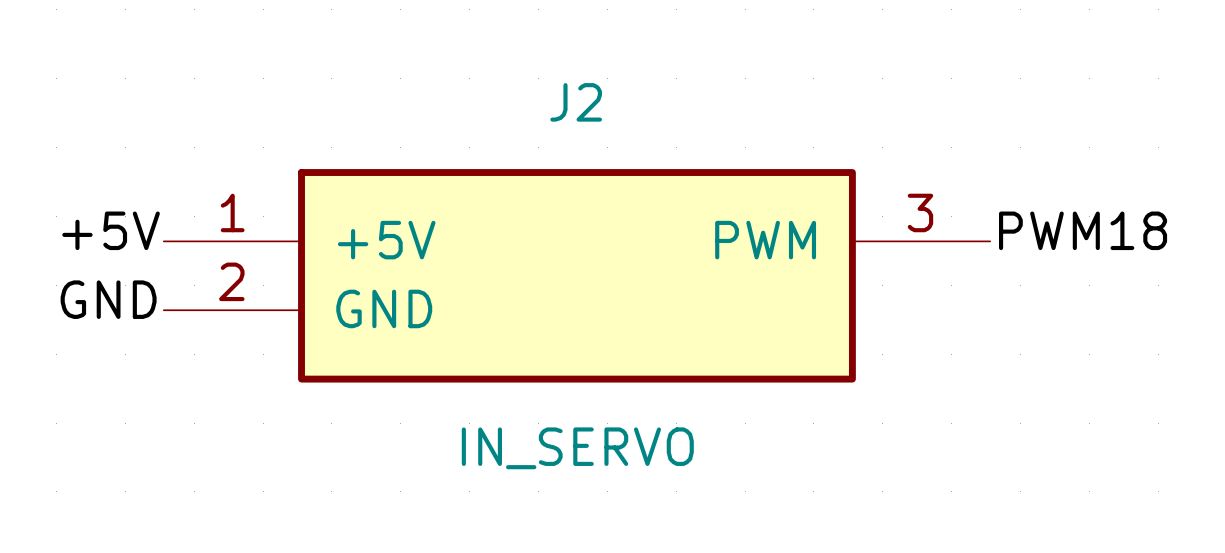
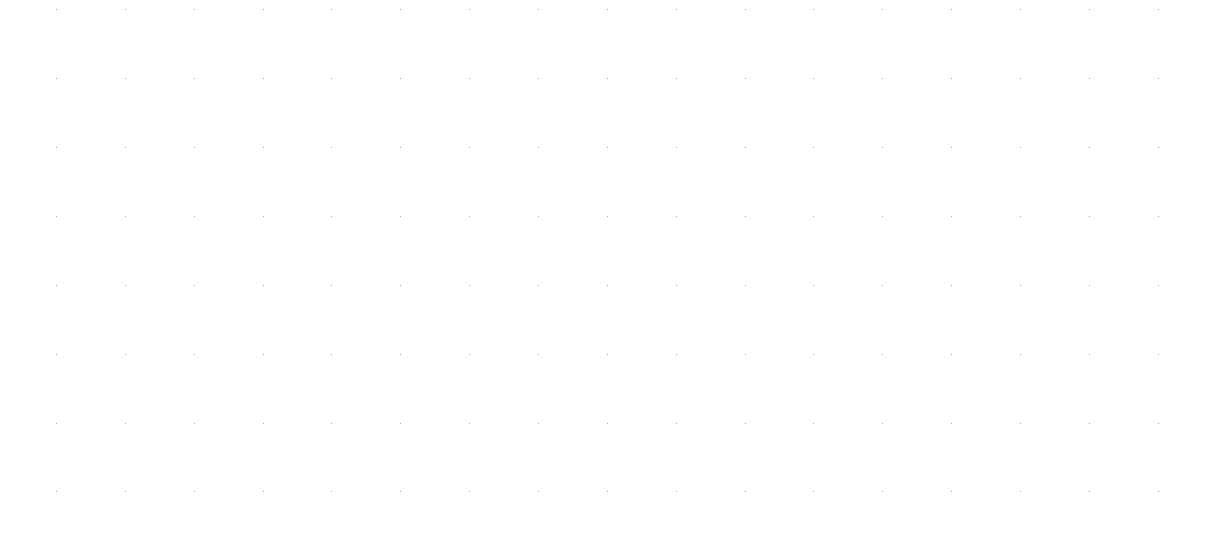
label: +5V (111, 230) -> none
label: PWM18 (1083, 230) -> none
J2: IN_SERVO (576, 275) -> none
label: GND (108, 299) -> none

